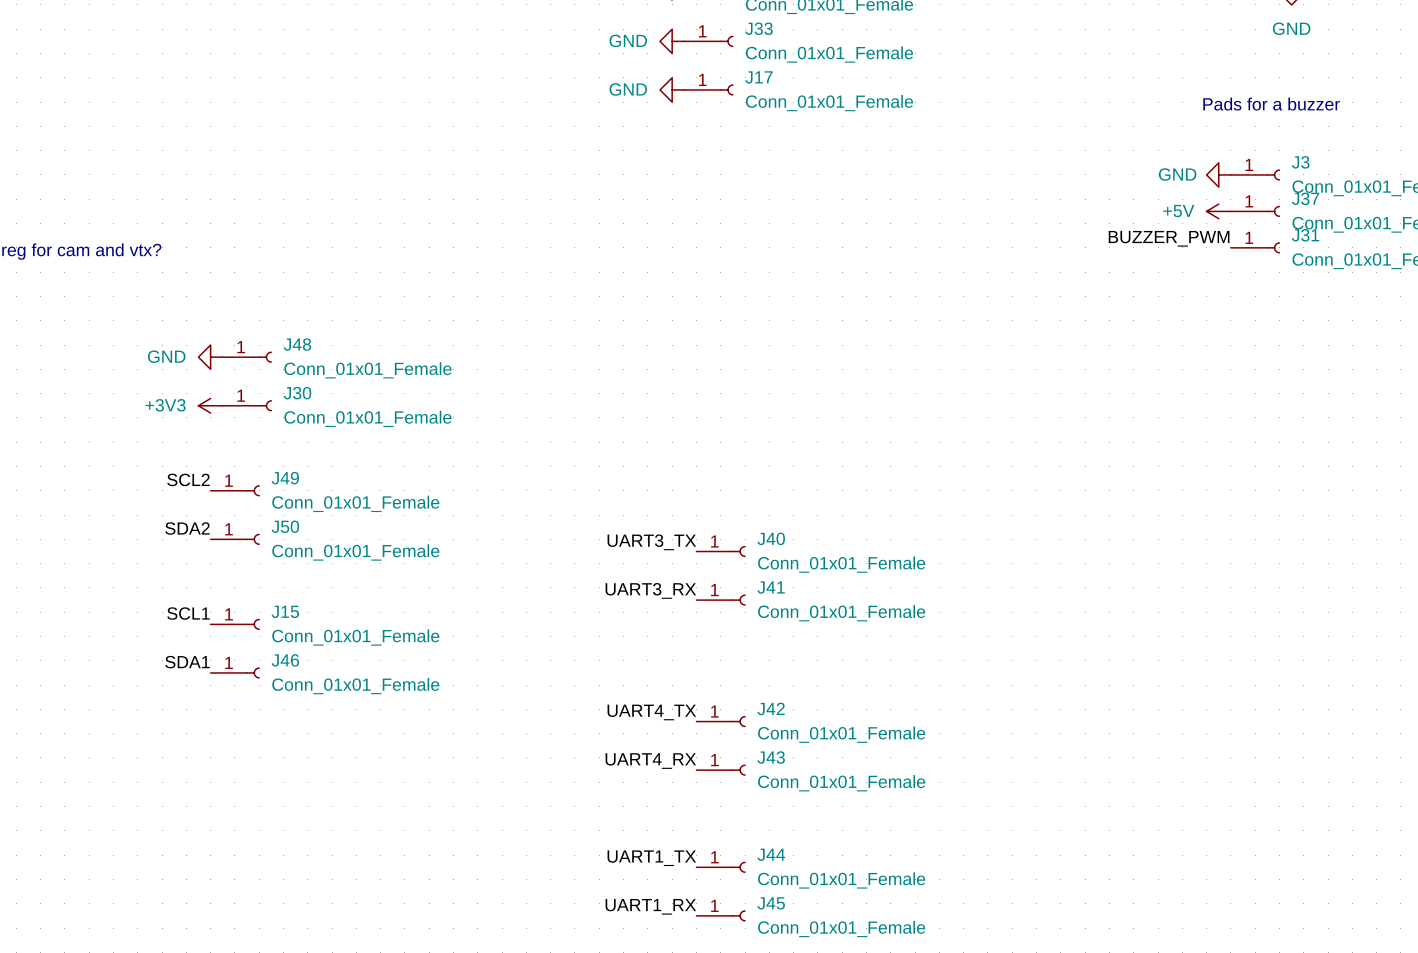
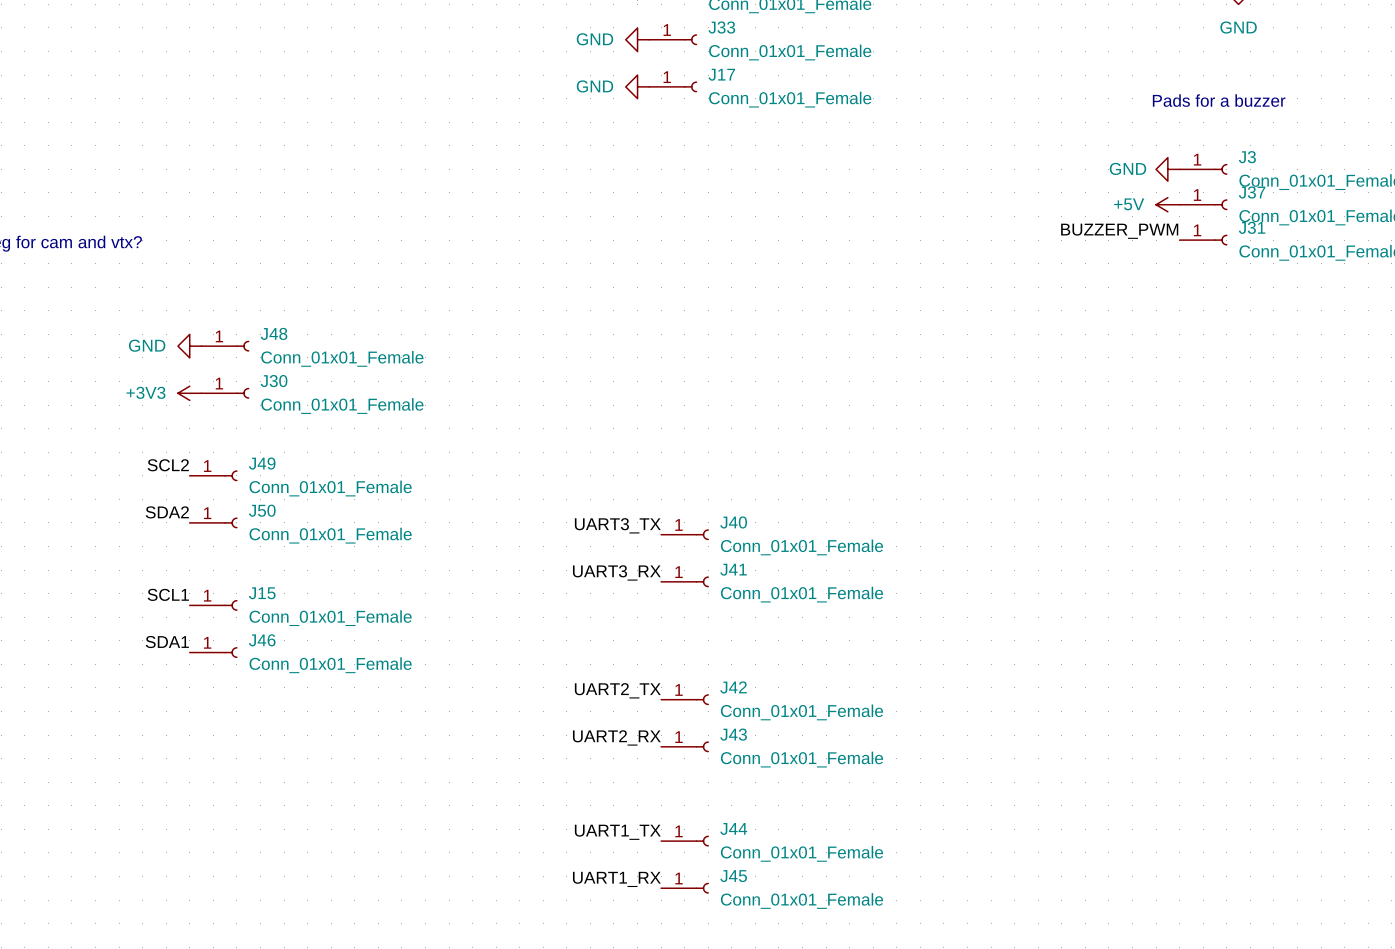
label: UART4_TX (651, 712) -> UART2_TX (617, 690)
label: UART4_RX (650, 761) -> UART2_RX (616, 737)

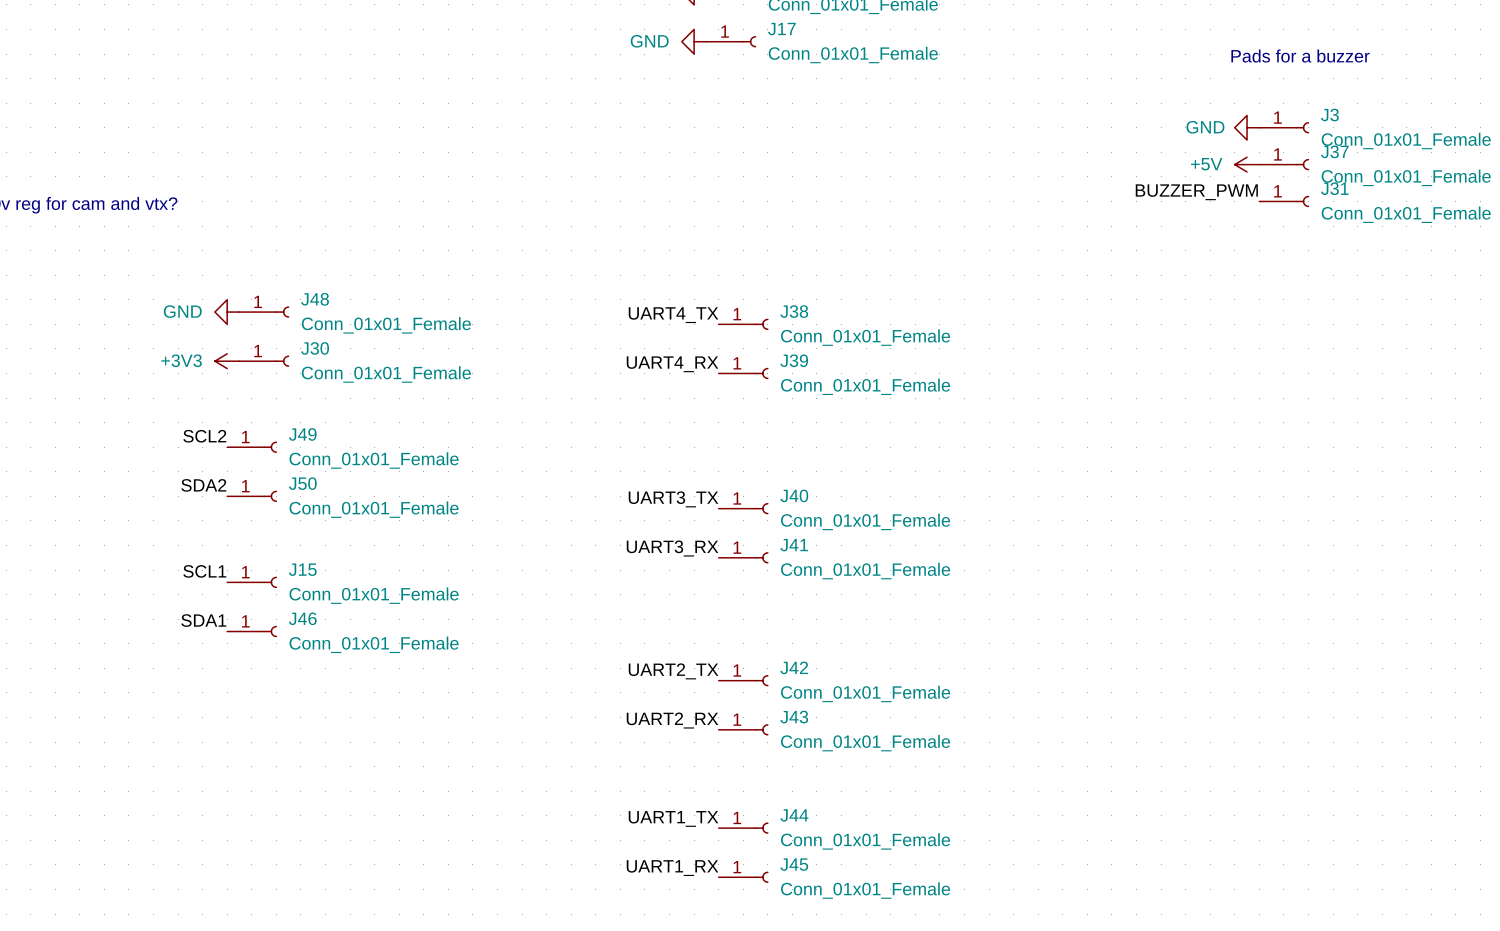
label: none -> UART4_TX (673, 315)
J38: none -> Conn_01x01_Female (743, 324)
label: none -> UART4_RX (672, 364)
J39: none -> Conn_01x01_Female (743, 373)

